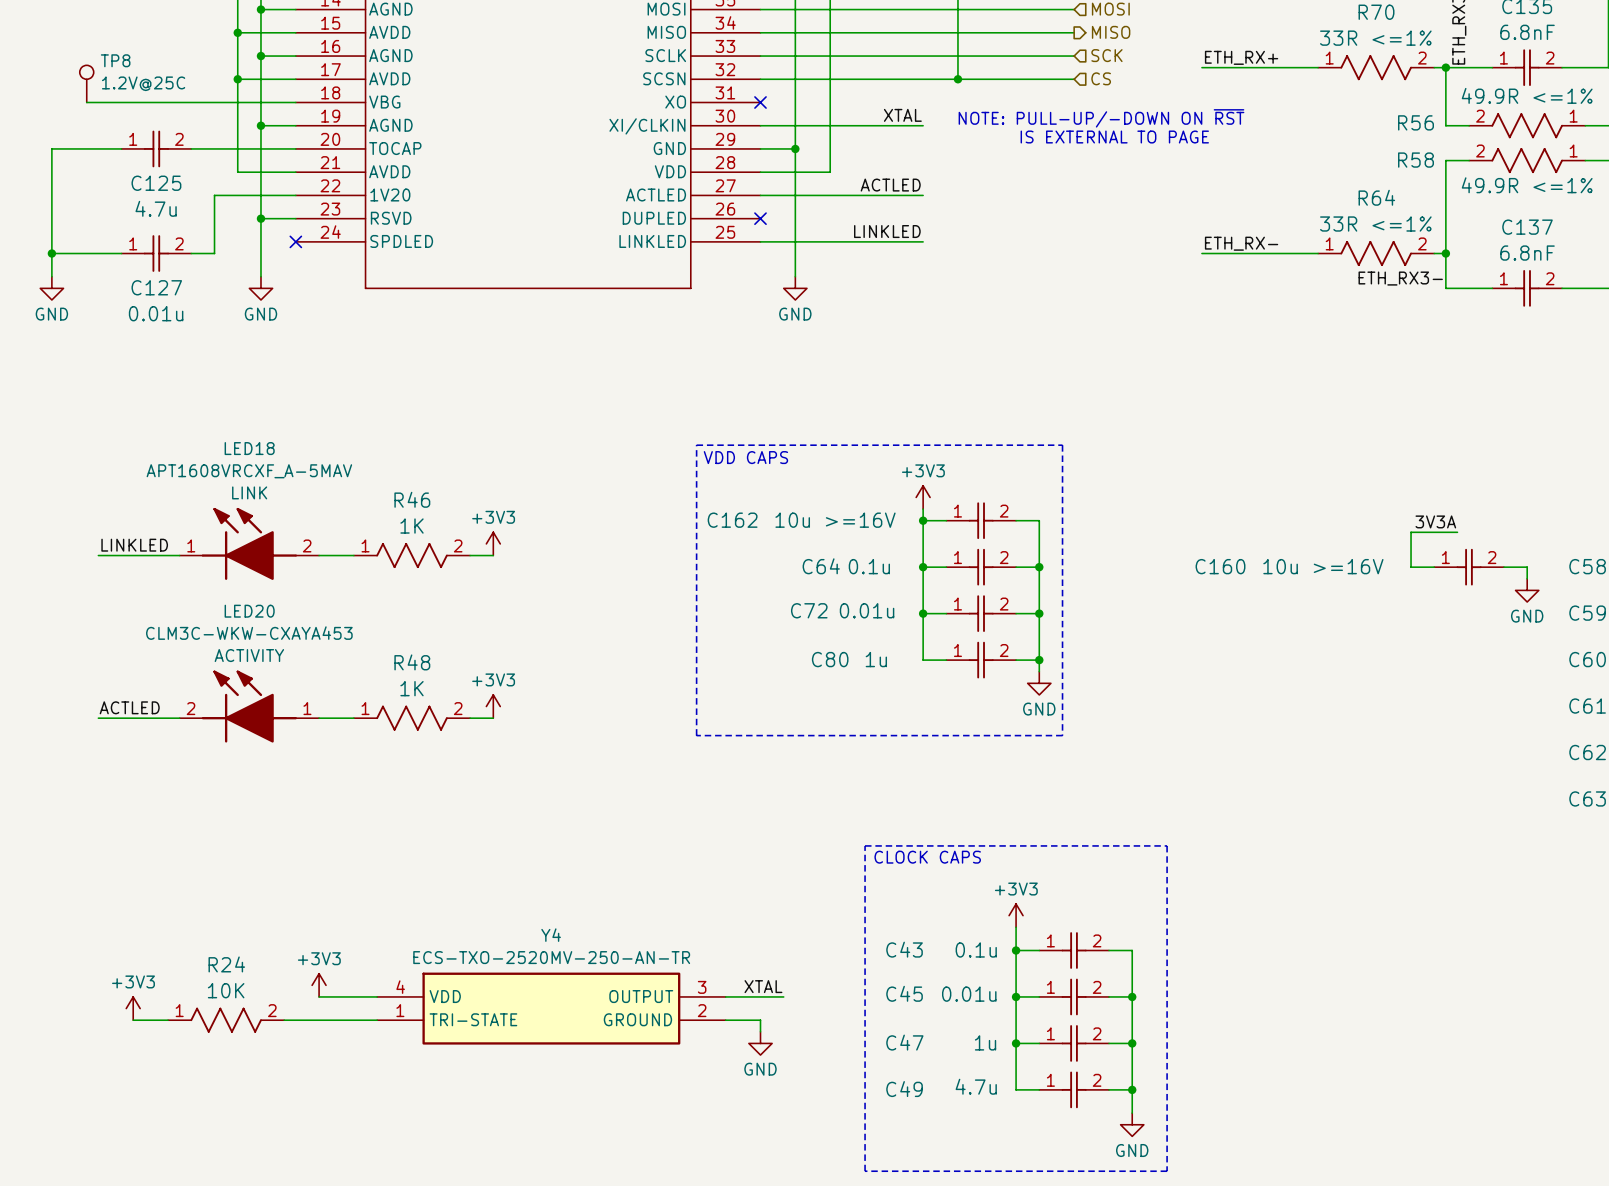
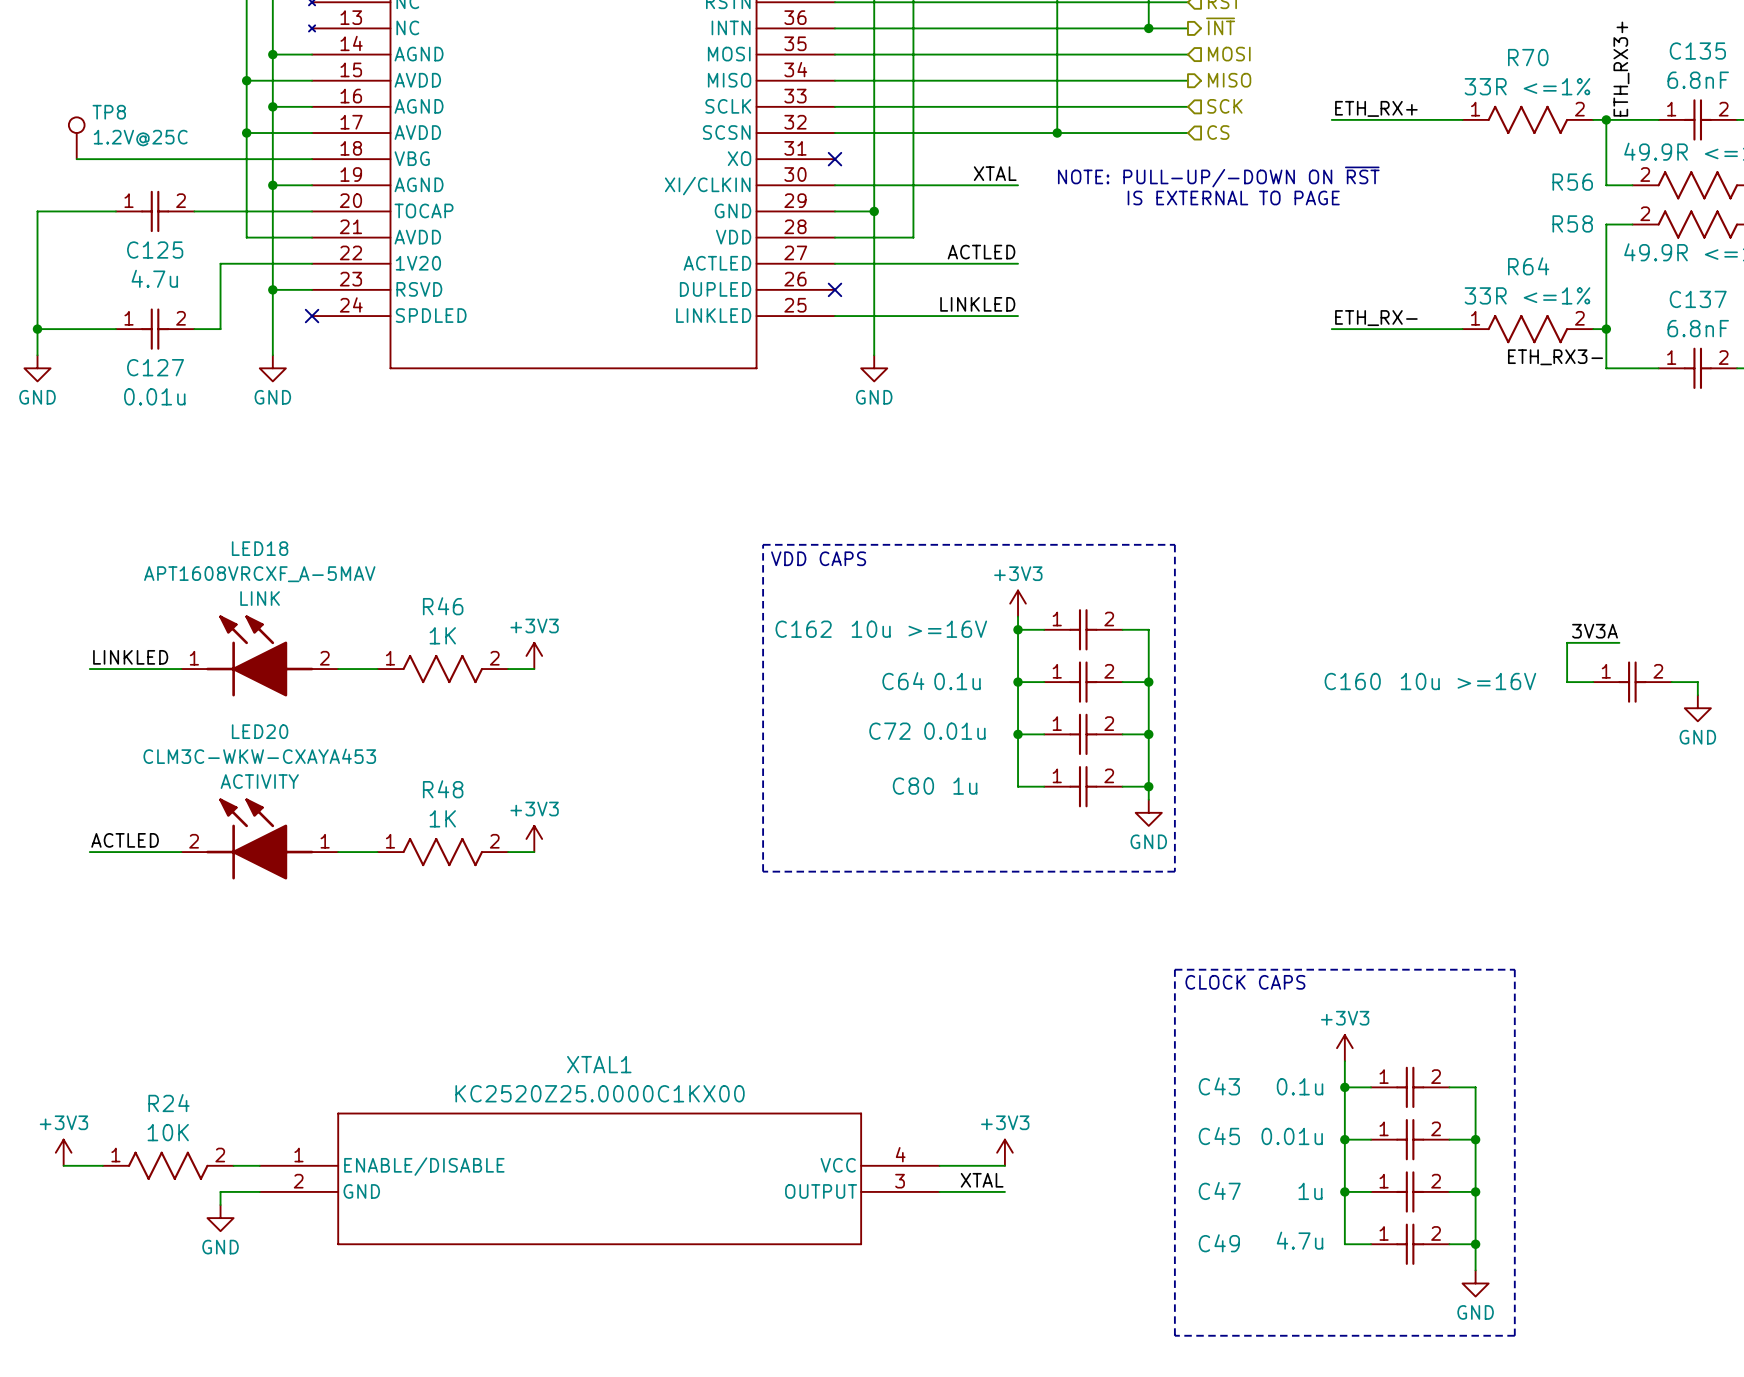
line: (865, 845) (1167, 845) (1167, 1171) (865, 1171) (865, 845) -> (1174, 969) (1514, 969) (1514, 1335) (1174, 1335) (1174, 969)
text position: CLOCK CAPS (927, 857) -> CLOCK CAPS (1245, 982)
power symbol: none -> +3V3 (1344, 1048)
power symbol: +3V3 (1016, 915) -> none
wire: (1016, 927) (1016, 1089) (1039, 1089) -> (1344, 1061) (1344, 1244) (1371, 1244)
junction: none -> (1344, 1087)
wire: (1016, 950) (1039, 950) -> (1344, 1087) (1371, 1087)
junction: (1016, 950) -> none
C43 position: (1074, 950) -> (1410, 1087)
wire: (1108, 950) (1132, 950) (1132, 1113) -> (1449, 1087) (1475, 1087) (1475, 1270)
junction: none -> (1344, 1139)
junction: none -> (1475, 1139)
power symbol: +3V3 (319, 985) -> none
power symbol: none -> +3V3 (1004, 1152)
label position: XTAL (763, 986) -> XTAL (982, 1180)
wire: none -> (233, 1165) (259, 1165)
wire: (319, 996) (377, 996) -> none
wire: (725, 996) (783, 996) -> (939, 1165) (1004, 1165)
wire: (1016, 996) (1039, 996) -> (1344, 1139) (1371, 1139)
junction: (1016, 996) -> none
C45 position: (1074, 996) -> (1410, 1139)
wire: (1108, 996) (1132, 996) -> (1449, 1139) (1475, 1139)
junction: (1132, 996) -> none
power symbol position: +3V3 (133, 1008) -> +3V3 (63, 1152)
Y4: ECS-TXO-2520MV-250-AN-TR (551, 1008) -> none
XTAL1: none -> KC2520Z25.0000C1KX00 (599, 1178)
wire: (133, 1020) (168, 1020) -> (63, 1165) (102, 1165)
R24 position: (226, 1020) -> (168, 1165)
wire: none -> (259, 1191) (220, 1191) (220, 1205)
wire: (284, 1020) (377, 1020) -> none
wire: (725, 1020) (760, 1020) (760, 1031) -> none
wire: none -> (939, 1191) (1004, 1191)
junction: none -> (1344, 1191)
junction: none -> (1475, 1191)
power symbol: none -> GND (220, 1218)
power symbol: GND (760, 1043) -> none
wire: (1016, 1043) (1039, 1043) -> (1344, 1191) (1371, 1191)
junction: (1016, 1043) -> none
C47 position: (1074, 1043) -> (1410, 1191)
wire: (1108, 1043) (1132, 1043) -> (1449, 1191) (1475, 1191)
junction: (1132, 1043) -> none
junction: none -> (1475, 1244)
C49 position: (1074, 1089) -> (1410, 1244)
wire: (1108, 1089) (1132, 1089) -> (1449, 1244) (1475, 1244)
junction: (1132, 1089) -> none
power symbol position: GND (1132, 1124) -> GND (1475, 1283)

